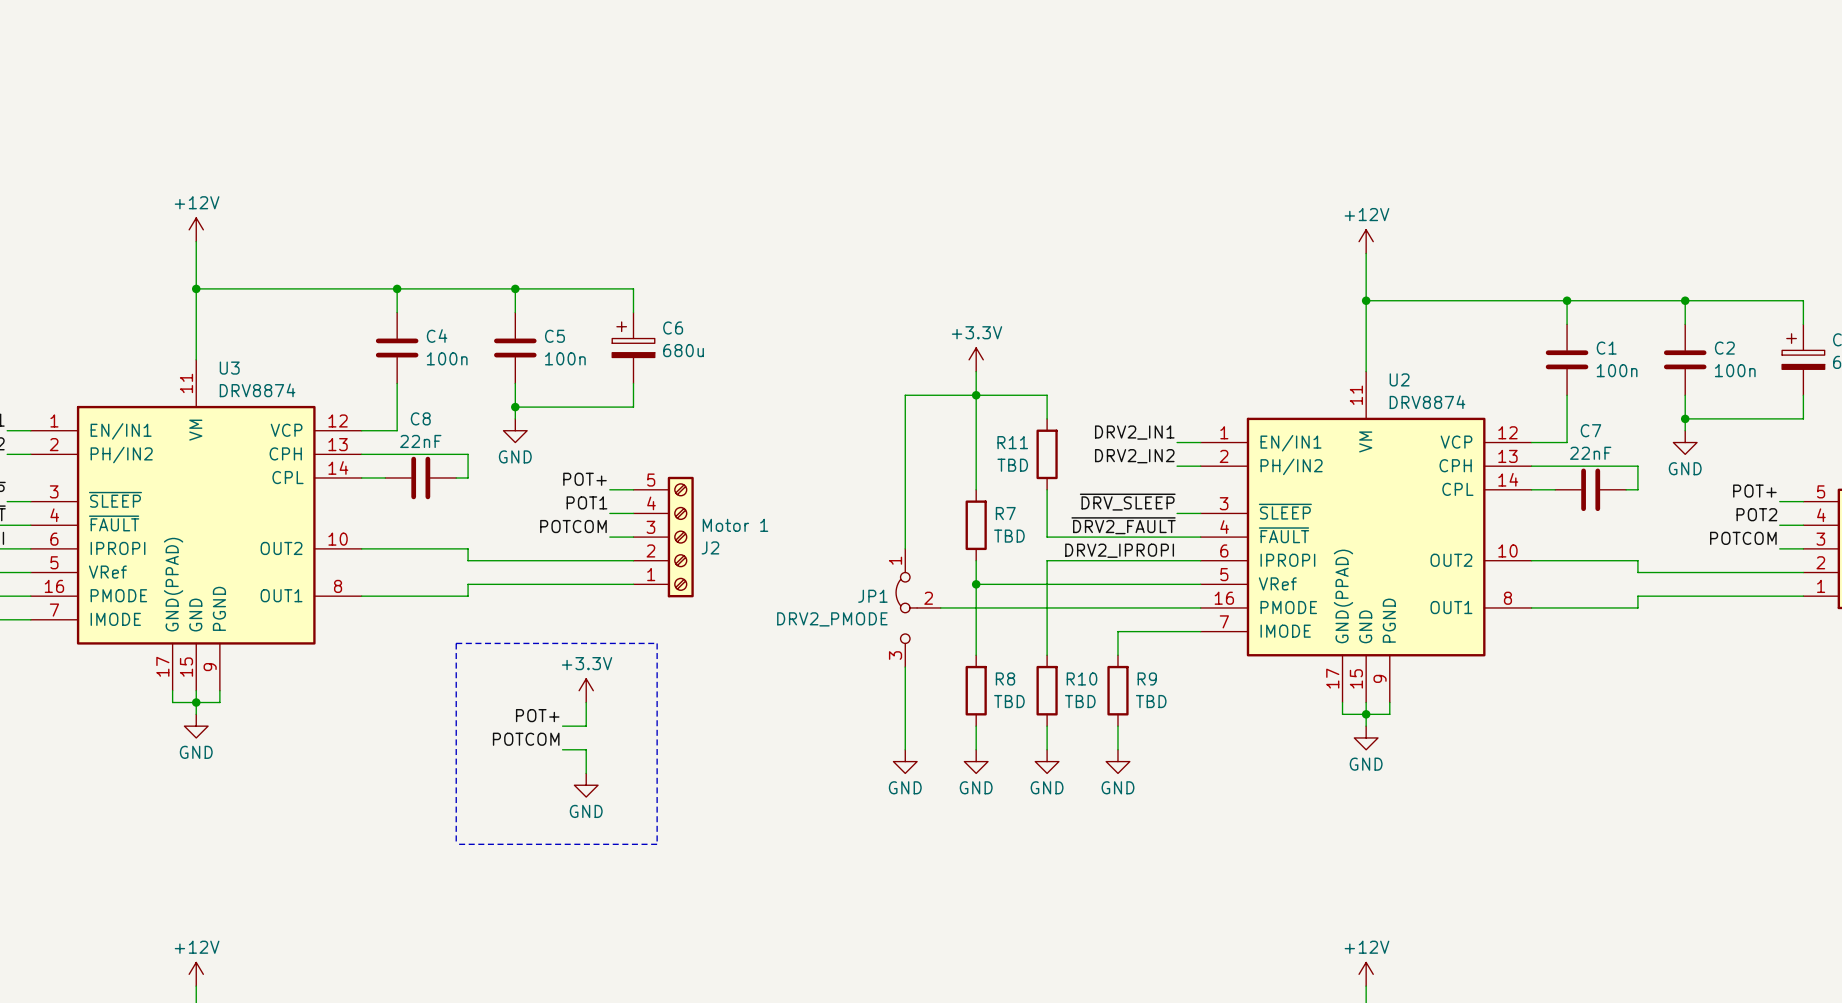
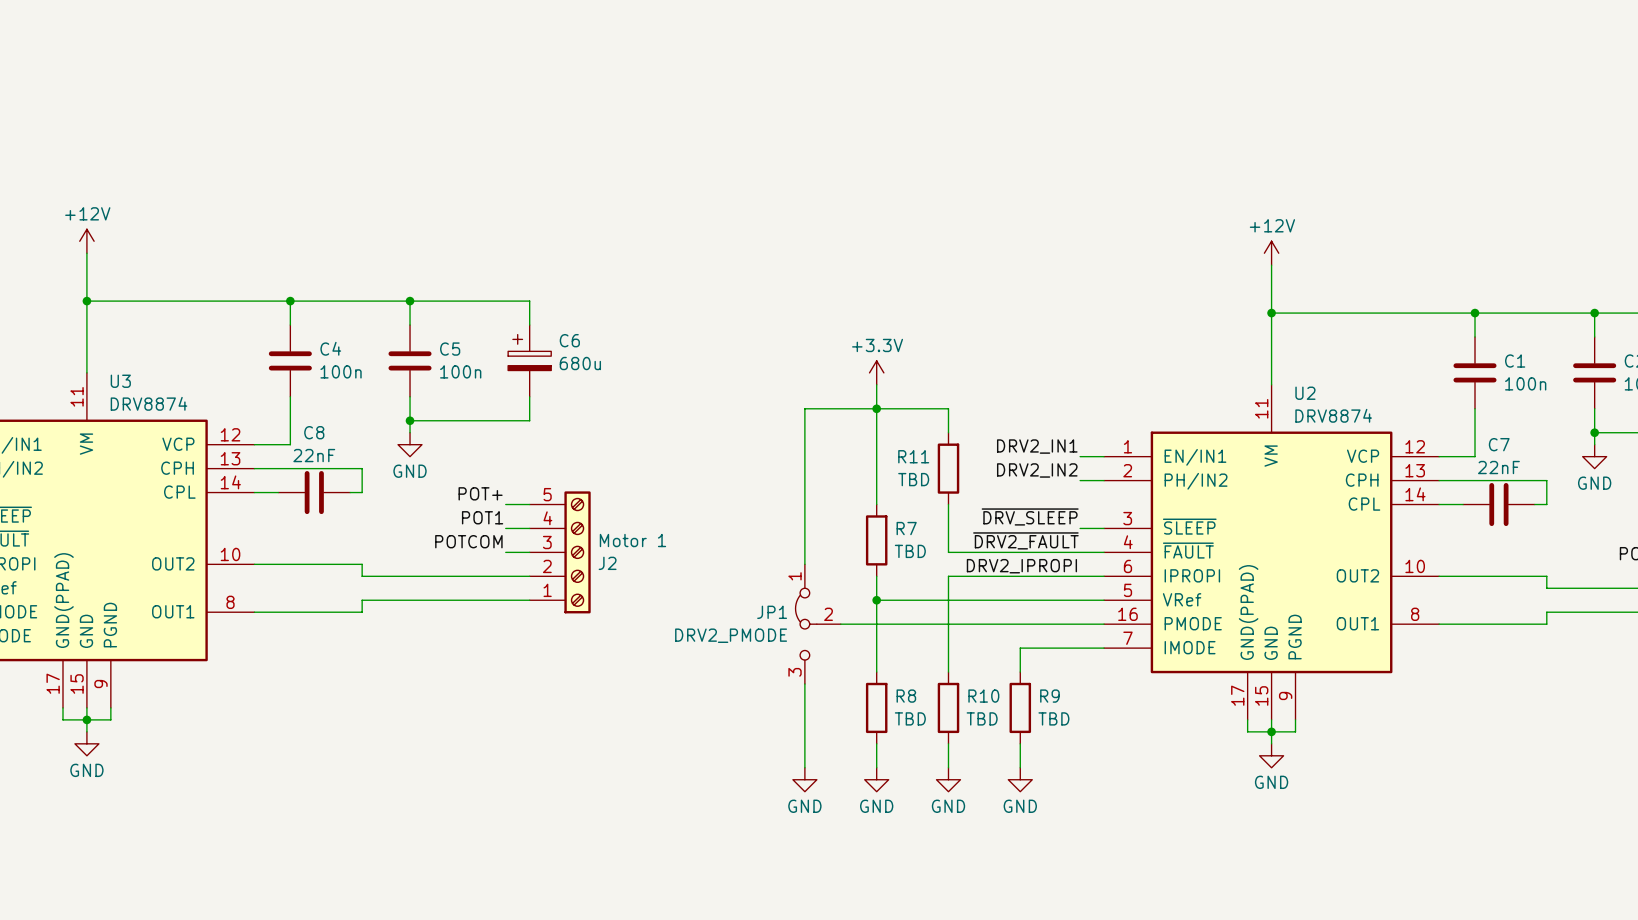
line: (456, 643) (456, 844) (657, 844) (657, 643) (456, 643) -> none
power symbol: +3.3V (586, 690) -> none
wire: (586, 702) (586, 726) (562, 726) -> none
label: POT+ (537, 715) -> none
label: POTCOM (526, 739) -> none
wire: (562, 749) (586, 749) (586, 773) -> none
power symbol: GND (586, 785) -> none

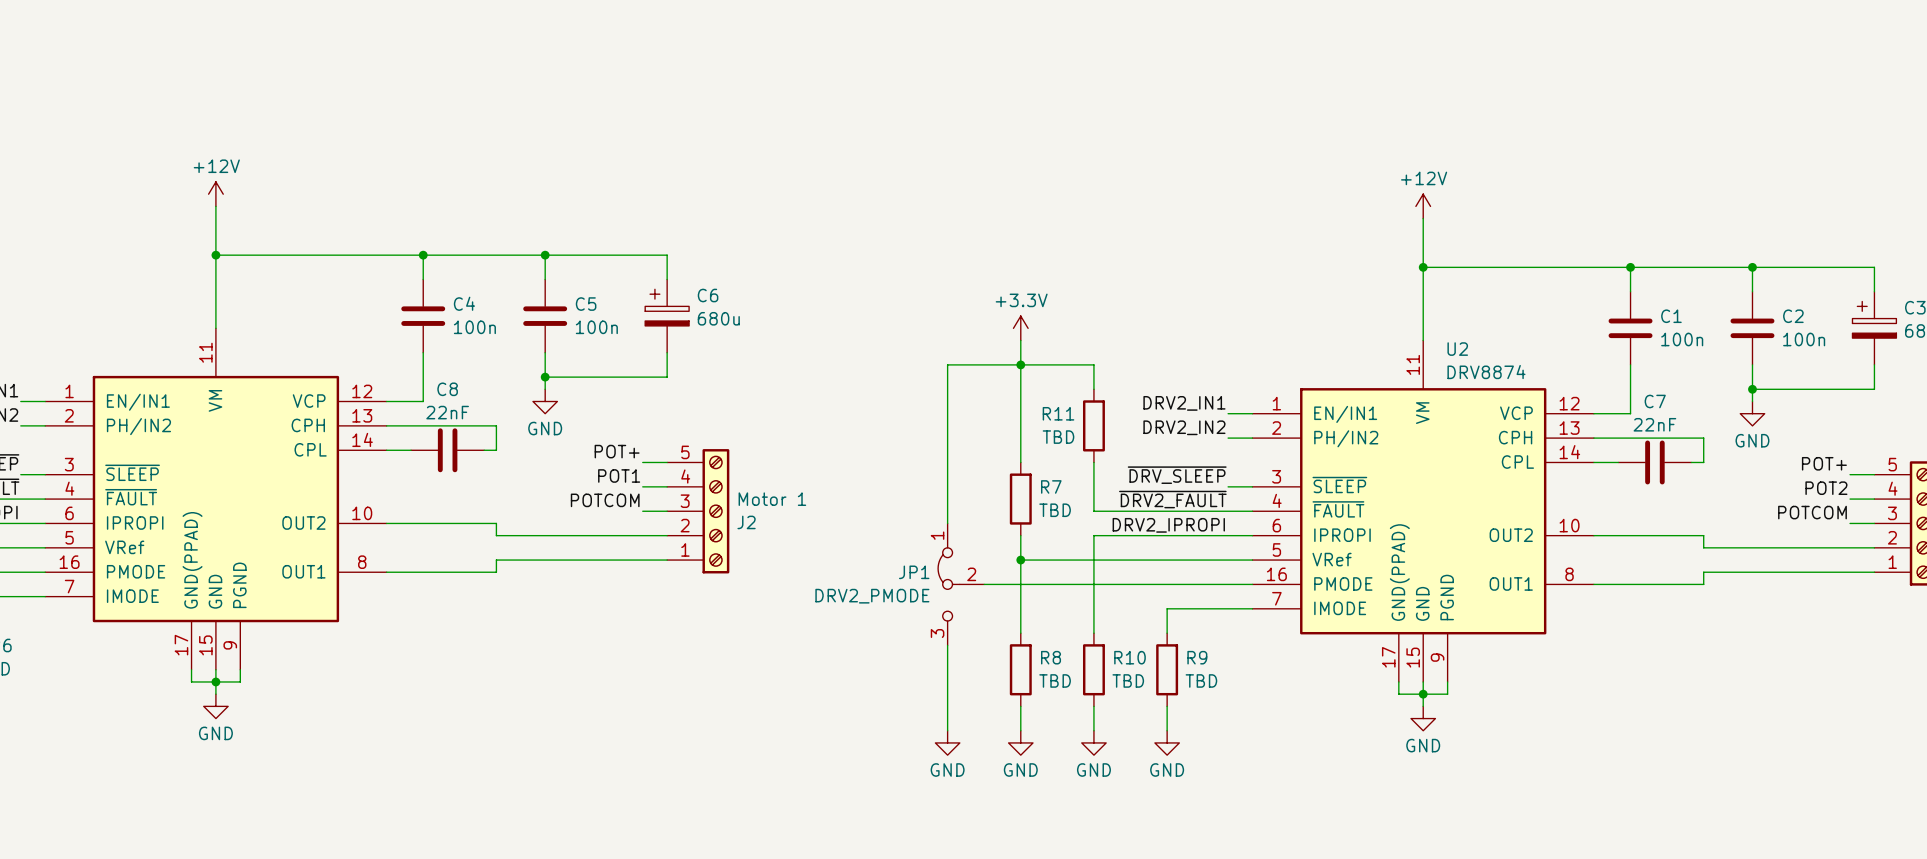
U3 name: U3 (120, 381) -> none
U3 value: DRV8874 (149, 403) -> none

